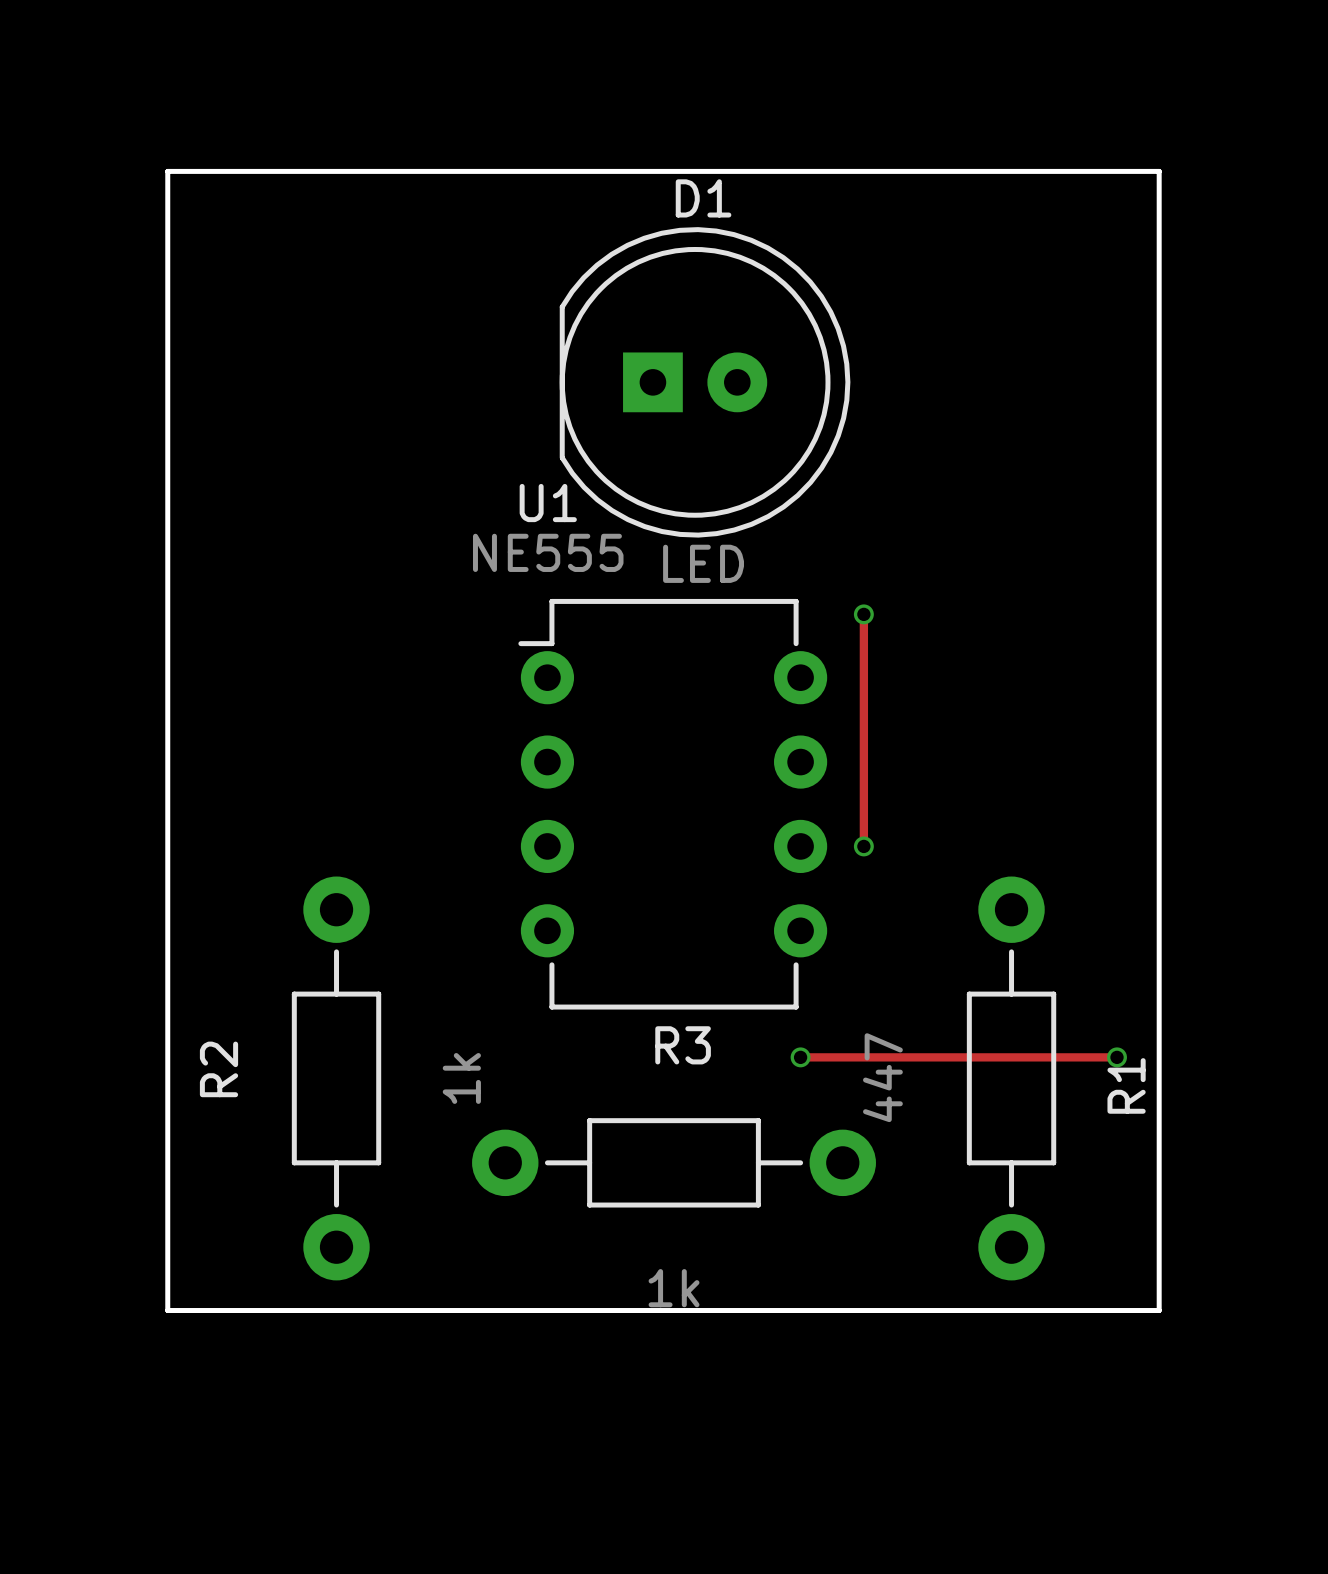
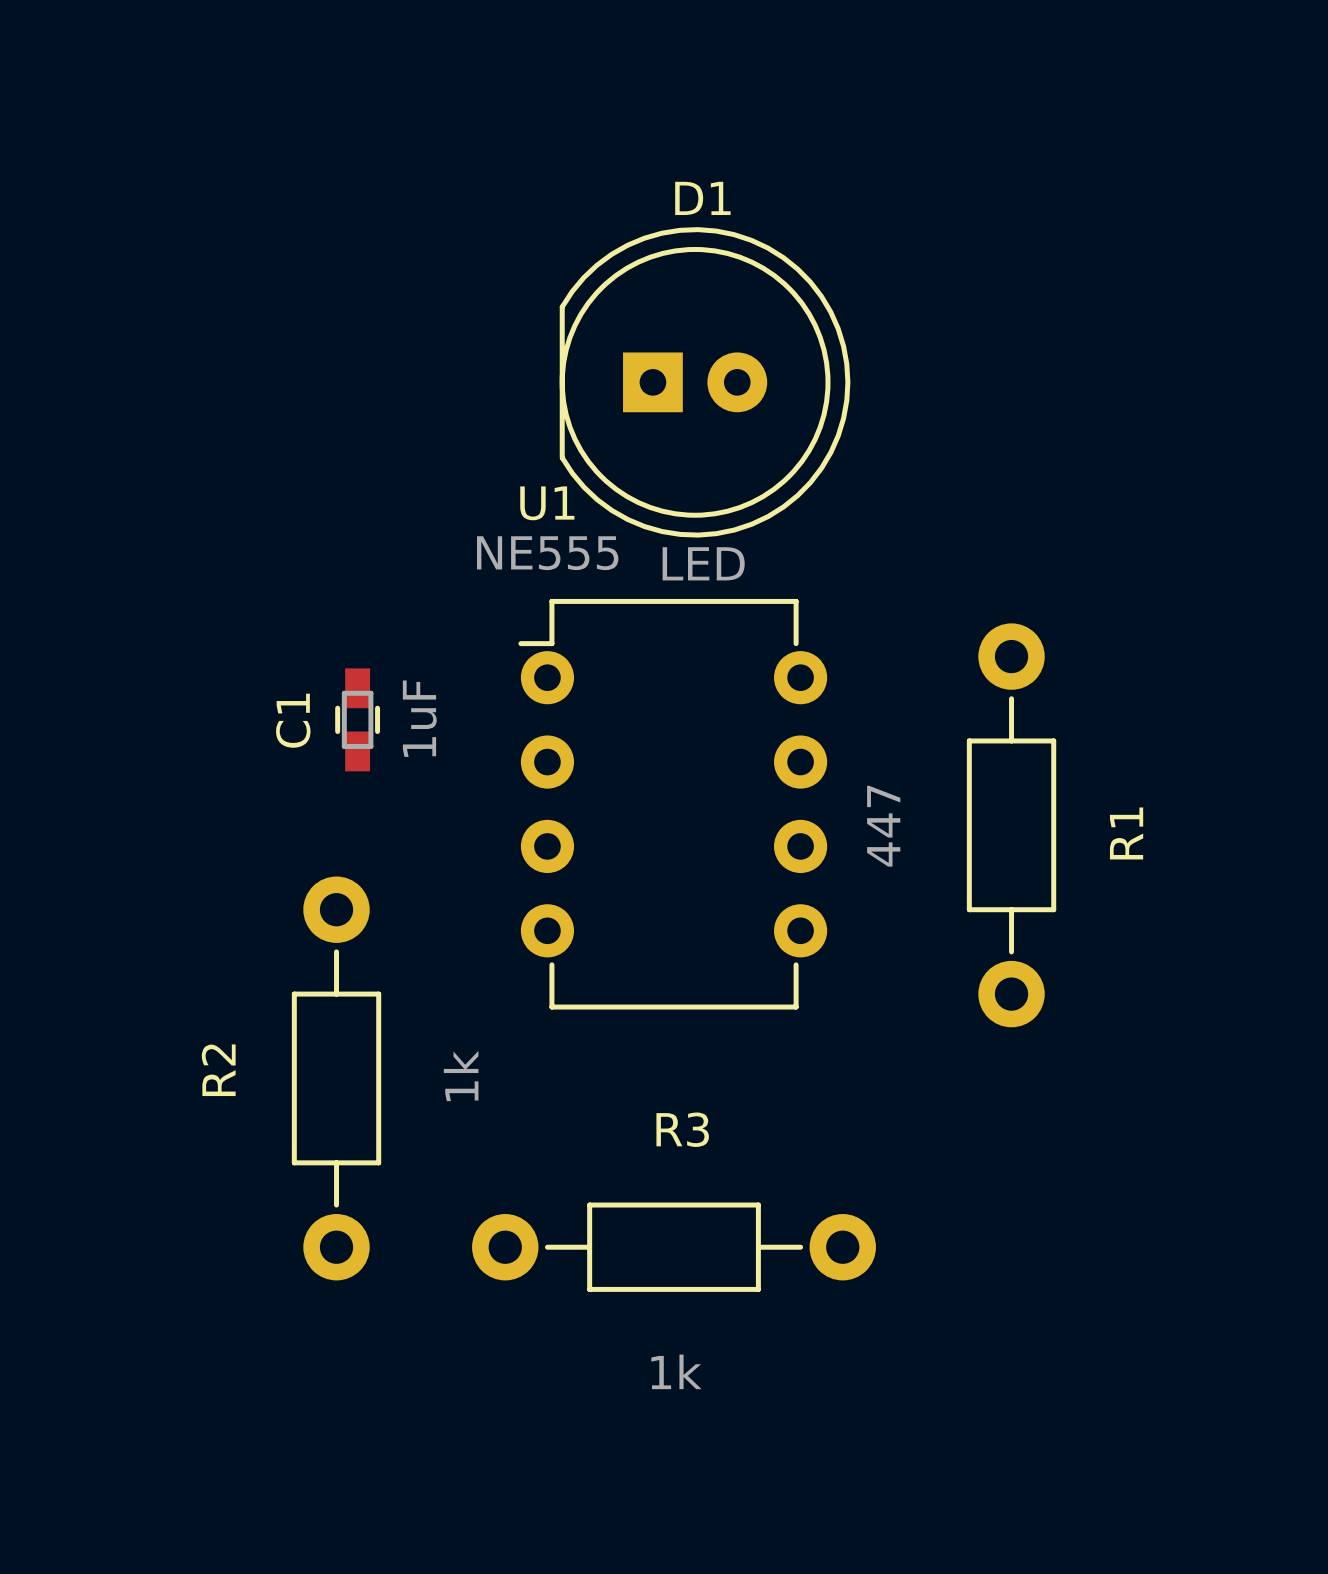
board edge: (167, 171) (1159, 171) (1159, 1310) (167, 1310) (167, 171) -> none
track: (863, 614) (863, 846) -> none
via: (863, 614) -> none
C1: none -> 1uF (357, 719)
via: (863, 846) -> none
track: (800, 1057) (1117, 1057) -> none
via: (800, 1057) -> none
via: (1117, 1057) -> none
R1 position: (1011, 1078) -> (1011, 825)
R3 position: (674, 1162) -> (674, 1247)

